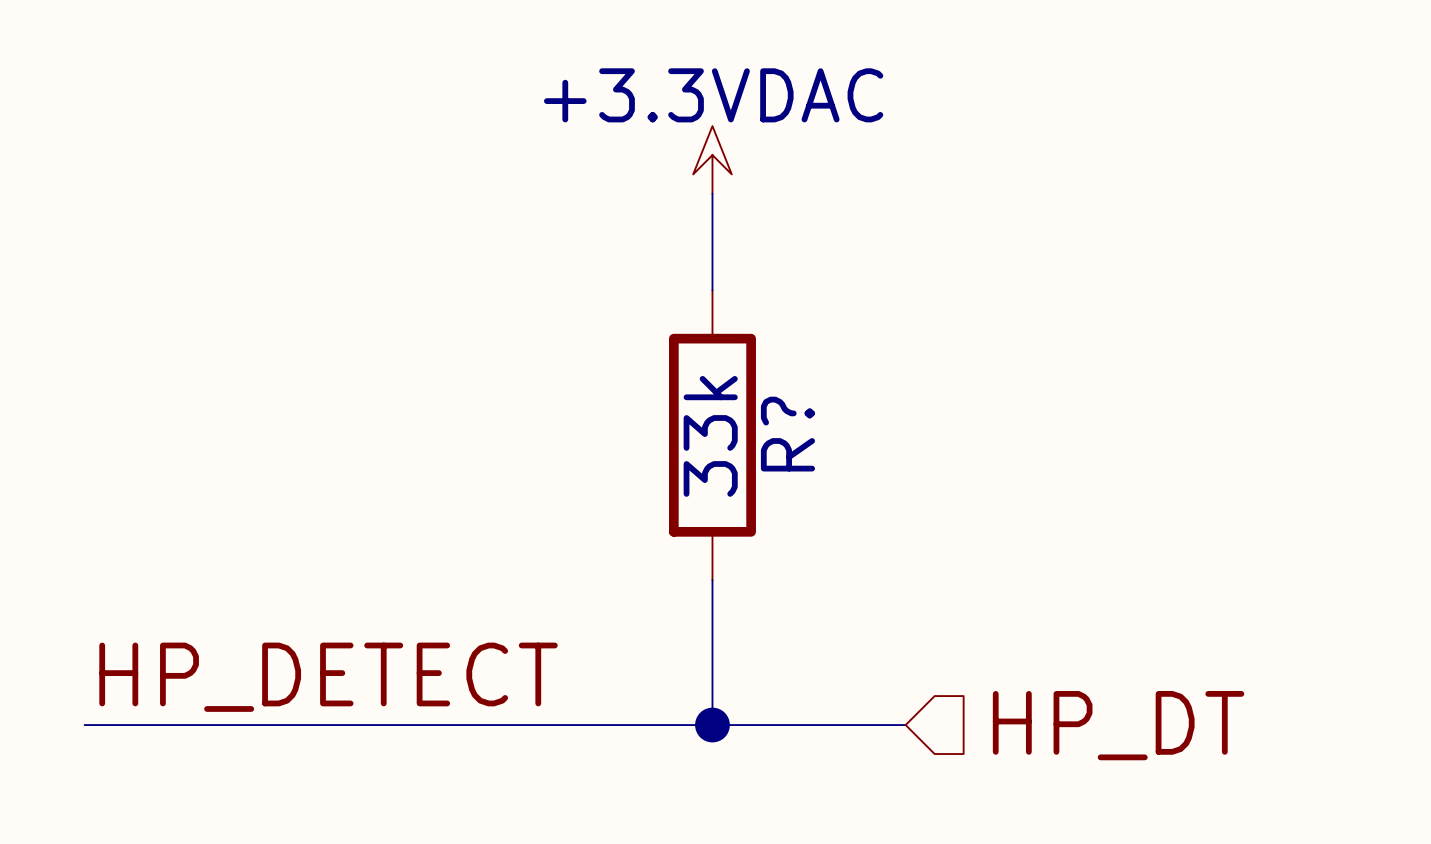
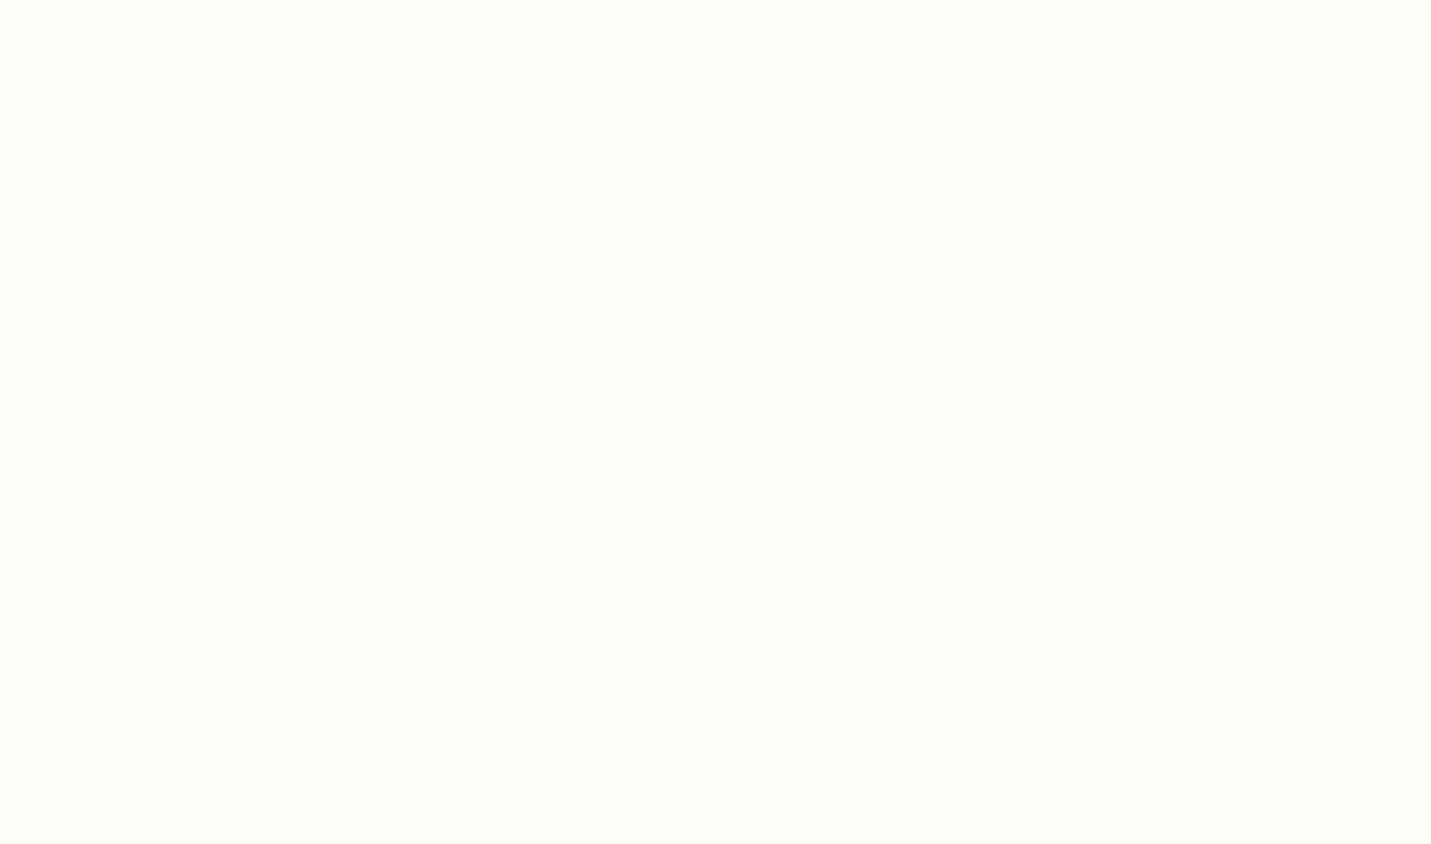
power symbol: +3.3VDAC (712, 159) -> none
wire: (712, 193) (712, 290) -> none
R?: 33k (712, 435) -> none
wire: (712, 580) (712, 725) -> none
label: HP_DETECT (328, 677) -> none
wire: (84, 725) (905, 725) -> none
junction: (712, 725) -> none
hierarchical label: HP_DT (1118, 725) -> none

